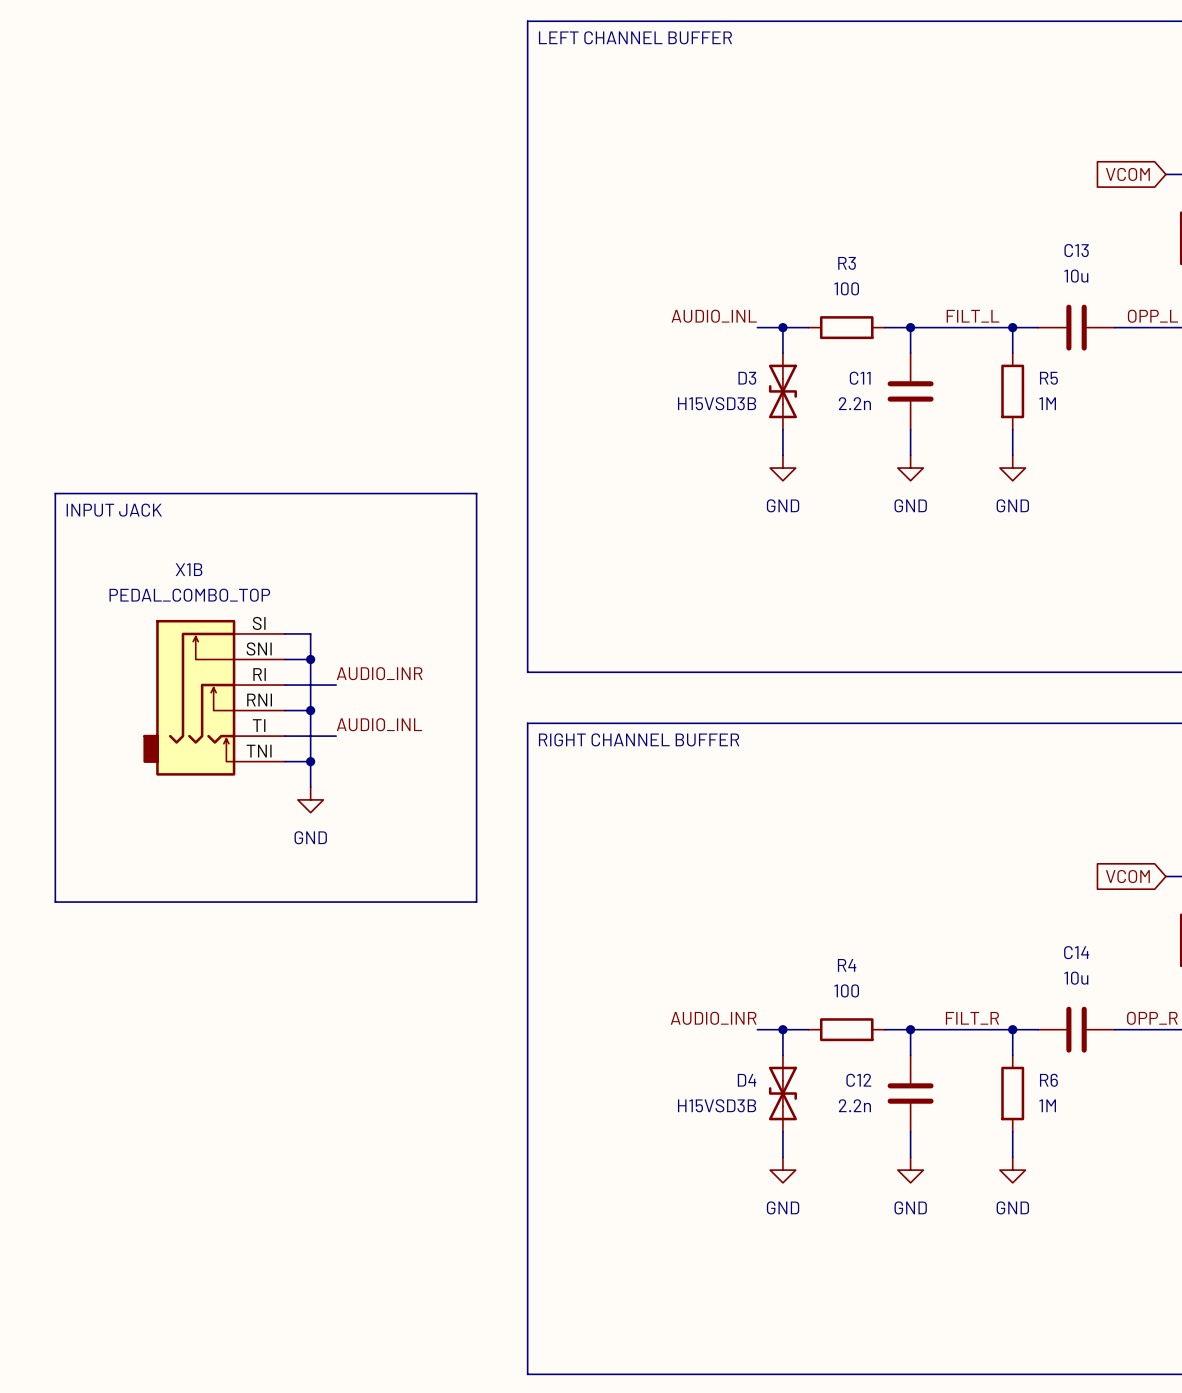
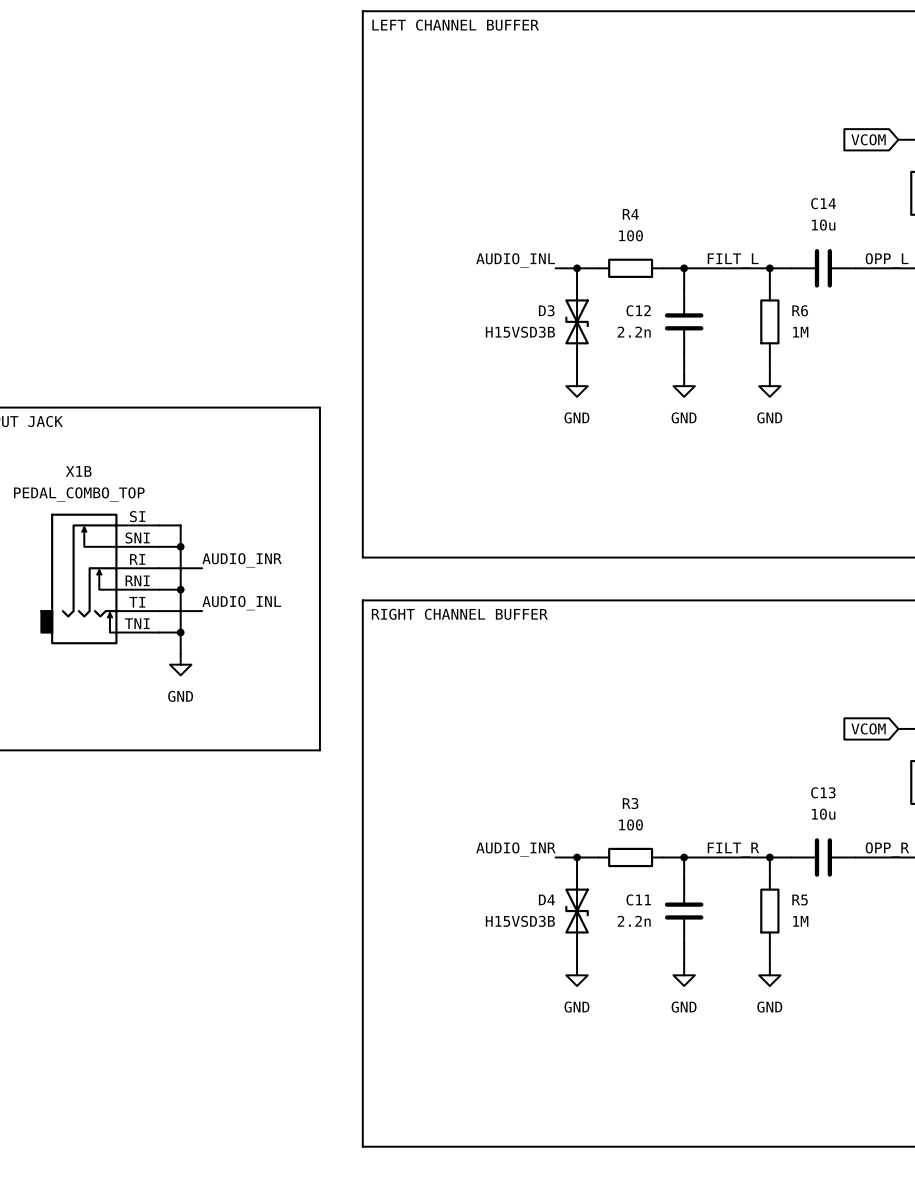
C13 name: C13 (1076, 250) -> C14 (823, 203)
R3 name: R3 (847, 263) -> R4 (630, 214)
C11 name: C11 (860, 378) -> C12 (638, 310)
R5 name: R5 (1048, 378) -> R6 (800, 310)
C14 name: C14 (1076, 952) -> C13 (823, 792)
R4 name: R4 (847, 965) -> R3 (630, 803)
C12 name: C12 (858, 1080) -> C11 (638, 899)
R6 name: R6 (1048, 1080) -> R5 (800, 900)

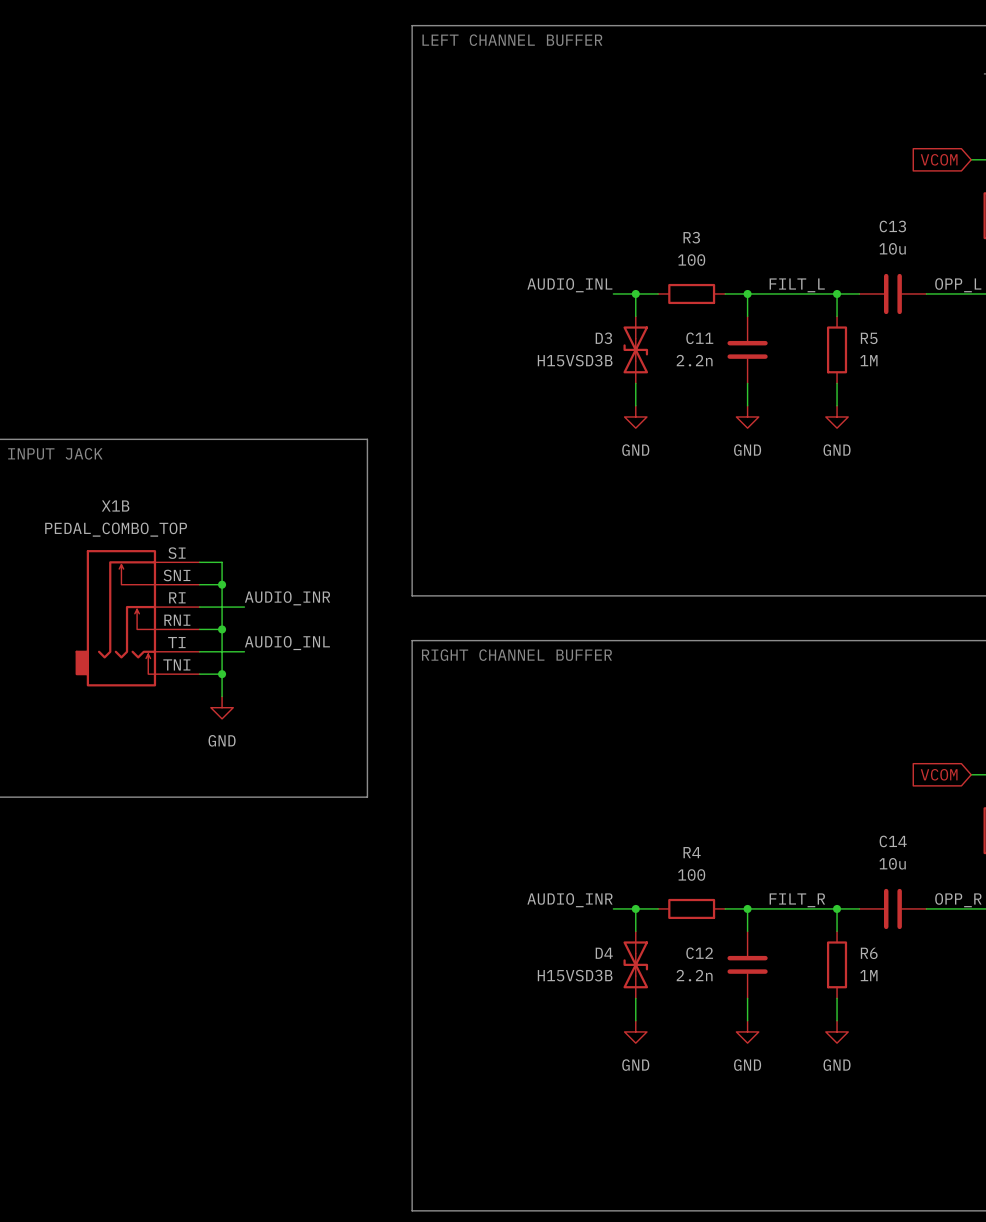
C14 name: C14 (823, 203) -> C13 (892, 226)
R4 name: R4 (630, 214) -> R3 (691, 237)
C12 name: C12 (638, 310) -> C11 (699, 338)
R6 name: R6 (800, 310) -> R5 (869, 338)
C13 name: C13 (823, 792) -> C14 (893, 841)
R3 name: R3 (630, 803) -> R4 (692, 852)
C11 name: C11 (638, 899) -> C12 (699, 953)
R5 name: R5 (800, 900) -> R6 (869, 953)

